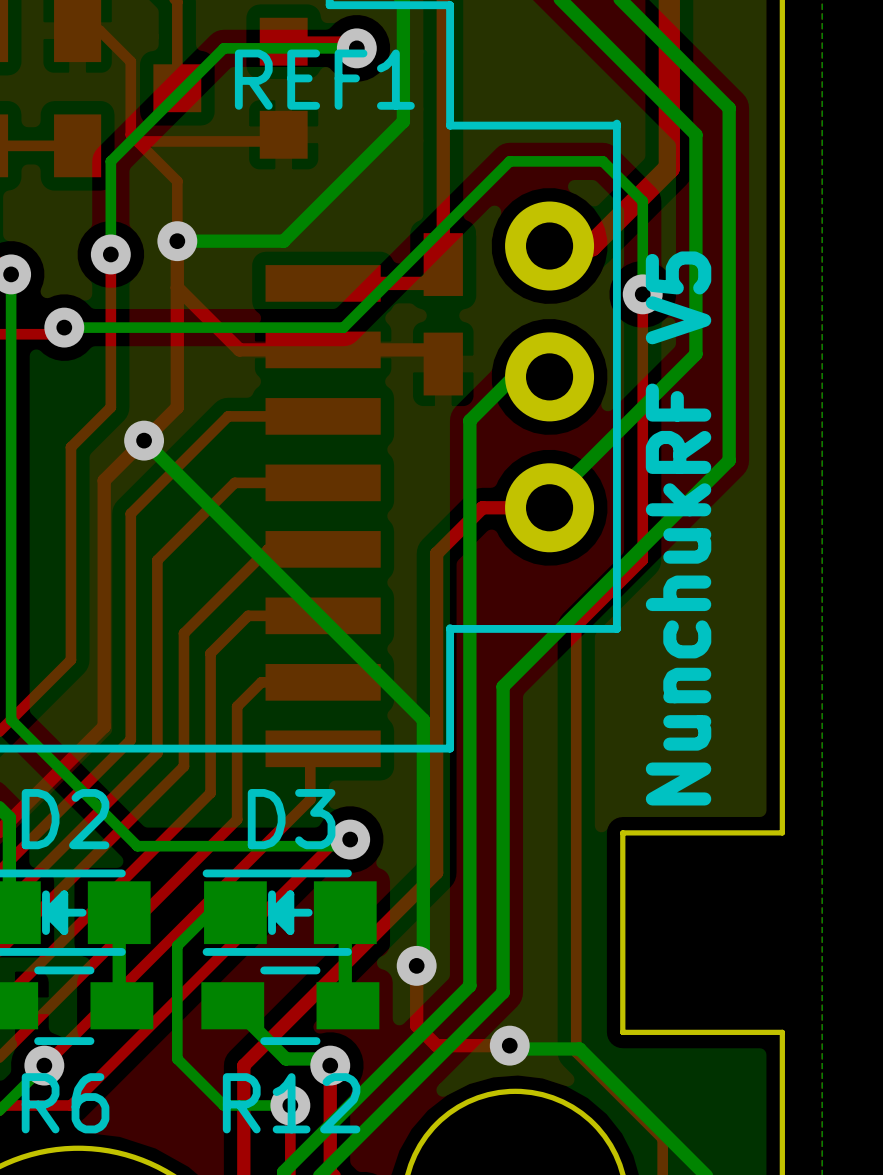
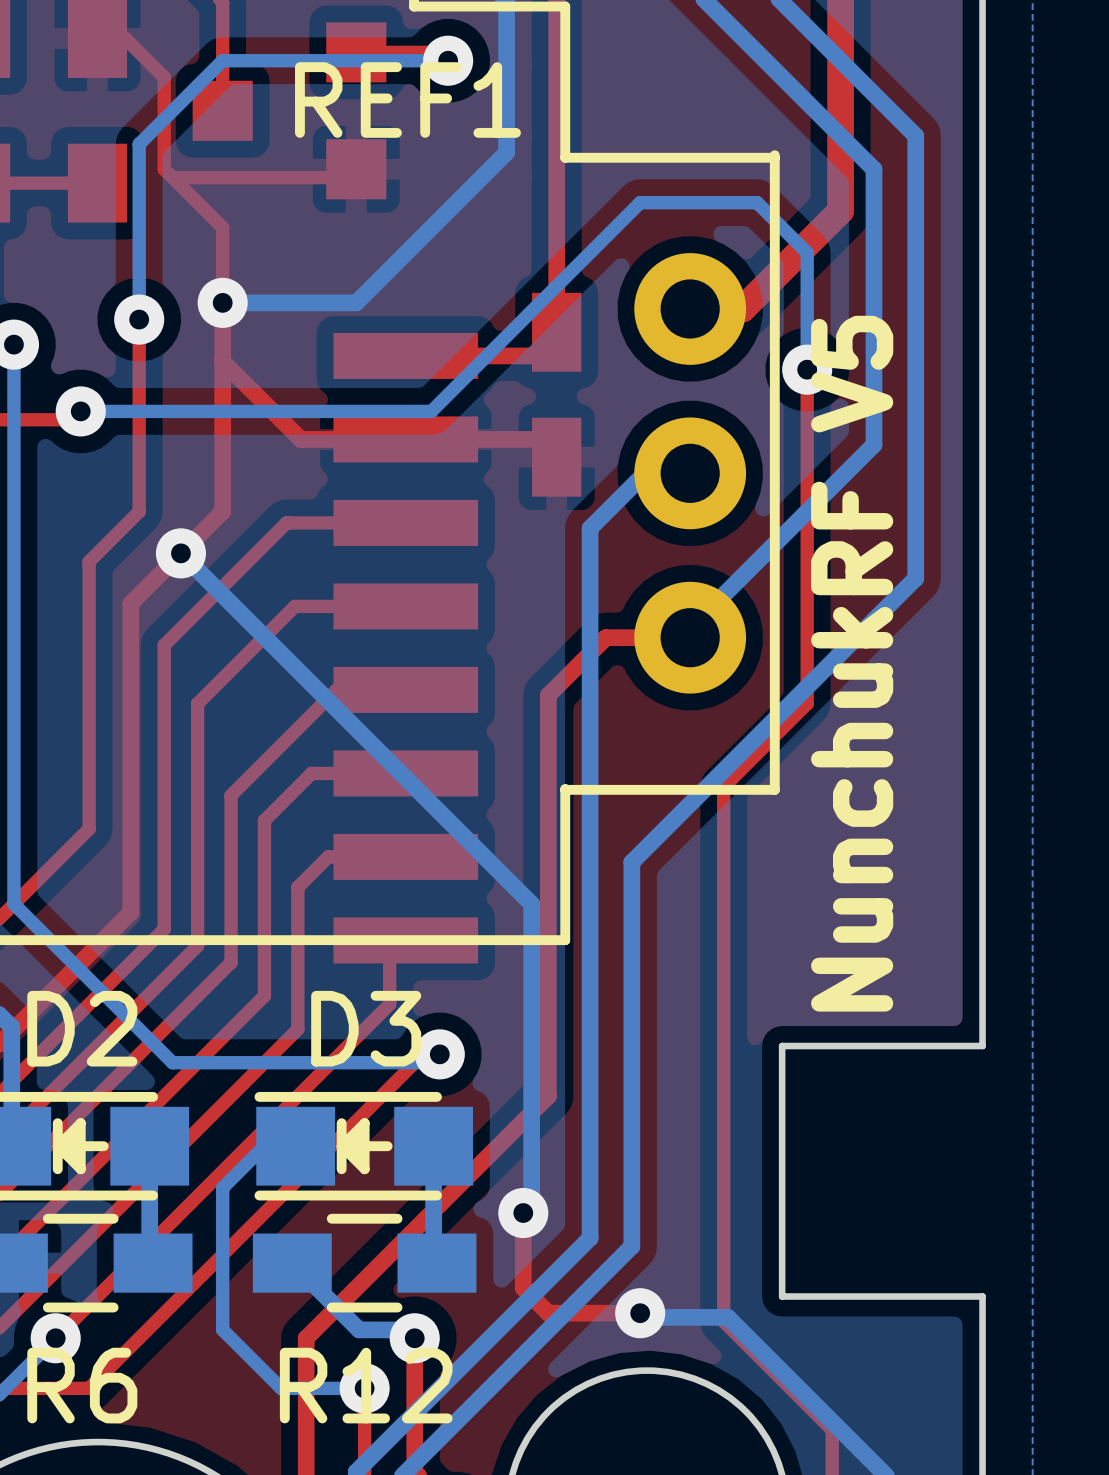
bottom track: (223, 48) (110, 161) -> (281, 60) (222, 60) (139, 144) (139, 202)

